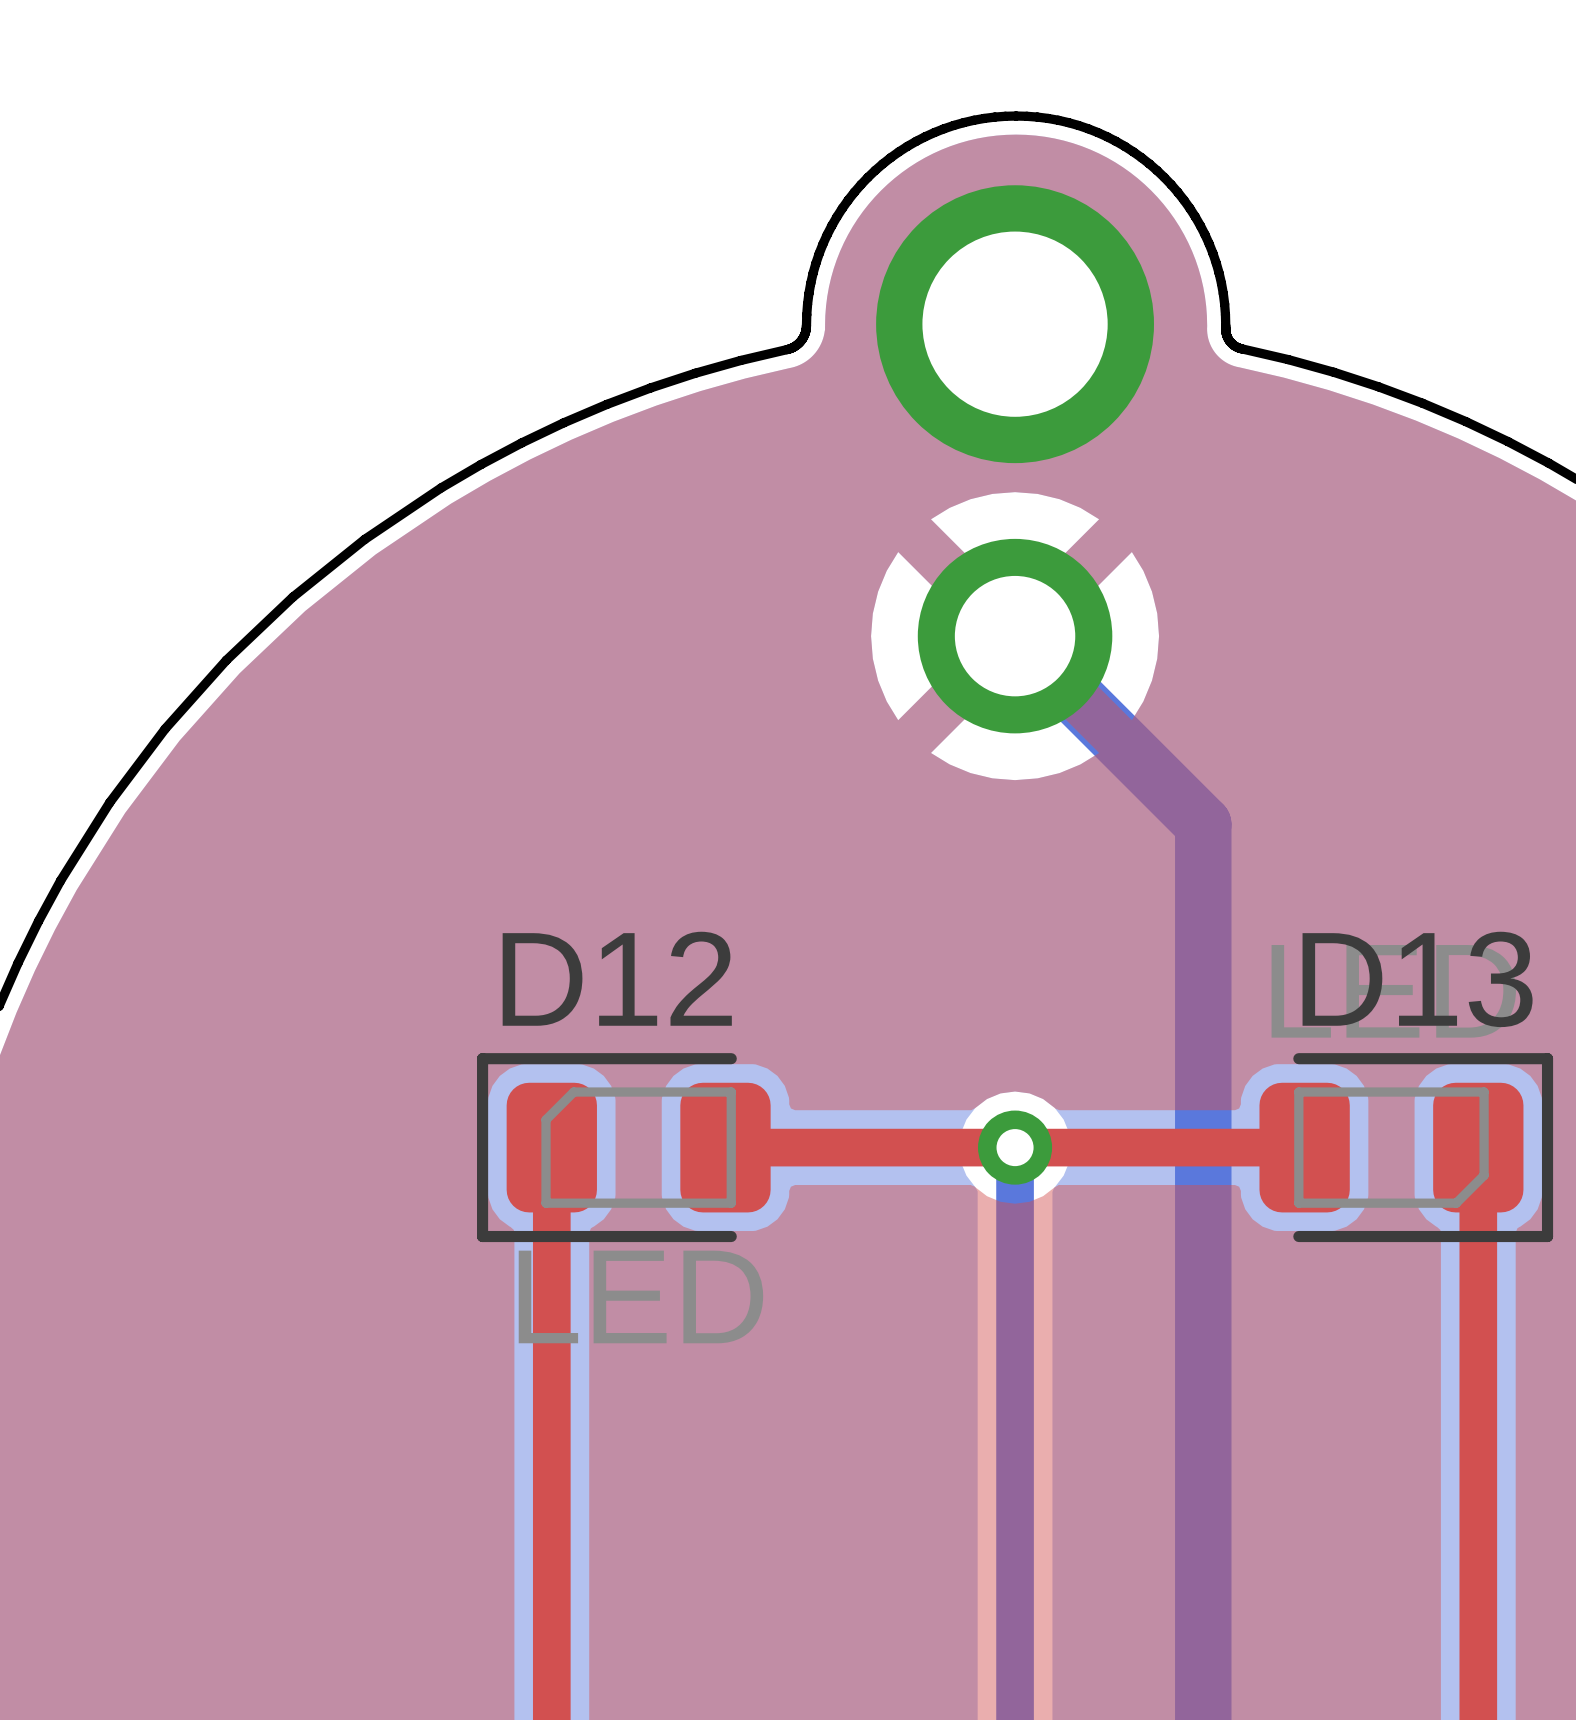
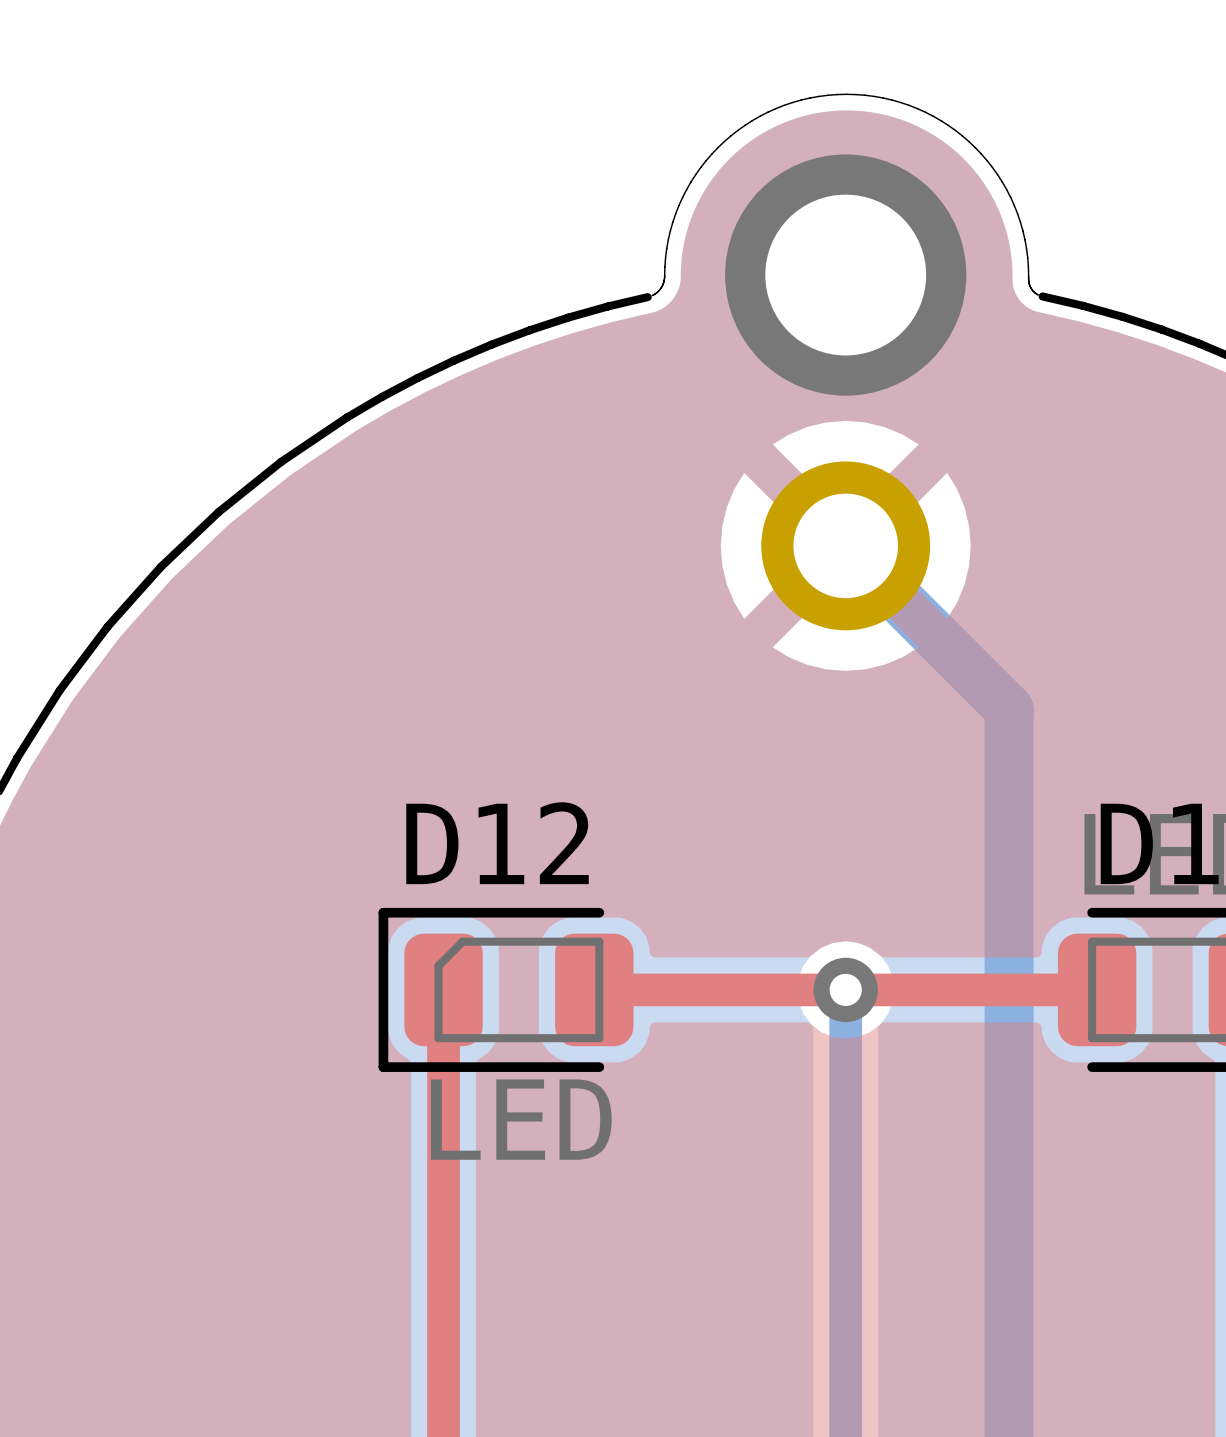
board edge width: thick (806, 325) (810, 283) (822, 244) (842, 208) (867, 177) (898, 151) (934, 132) (973, 120) (1016, 116) (1058, 120) (1097, 132) (1133, 151) (1164, 177) (1189, 208) (1209, 244) (1221, 283) (1225, 325) -> thin (664, 276) (668, 239) (678, 205) (695, 174) (717, 147) (744, 125) (775, 108) (809, 98) (846, 94) (883, 98) (917, 108) (948, 125) (975, 147) (997, 174) (1014, 205) (1024, 239) (1028, 276)

